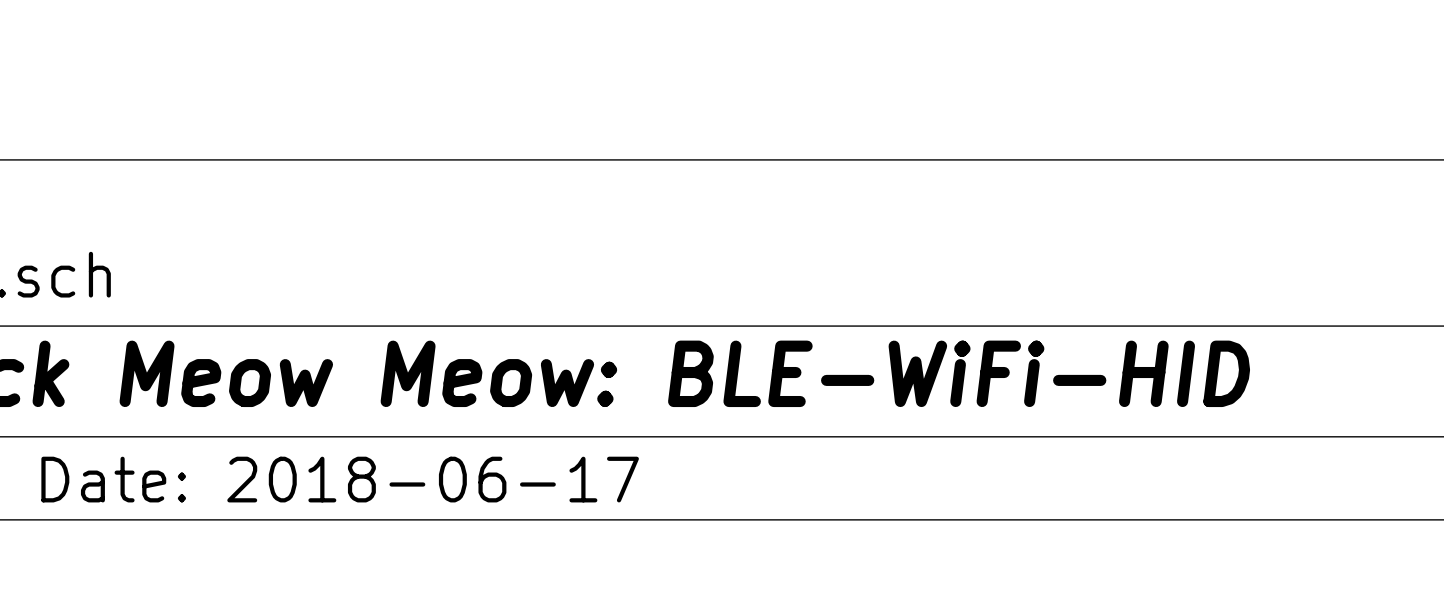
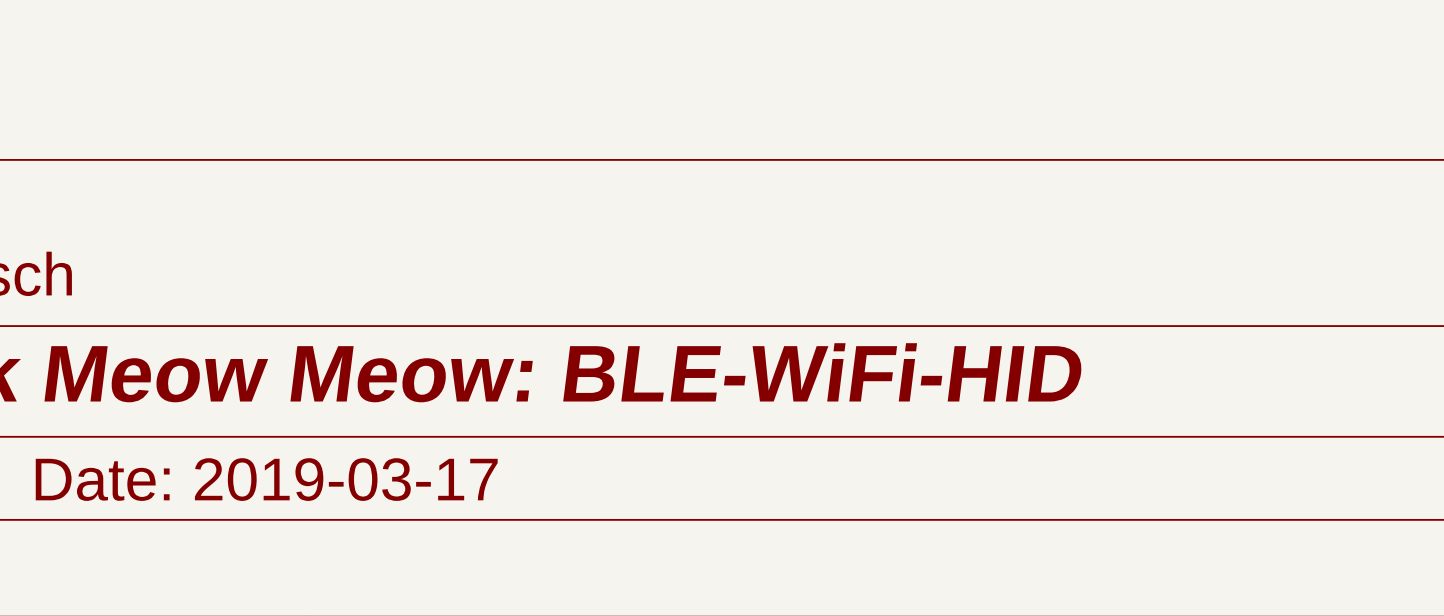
title block: Date: 2018-06-17 (340, 479) -> Date: 2019-03-17 (266, 479)

